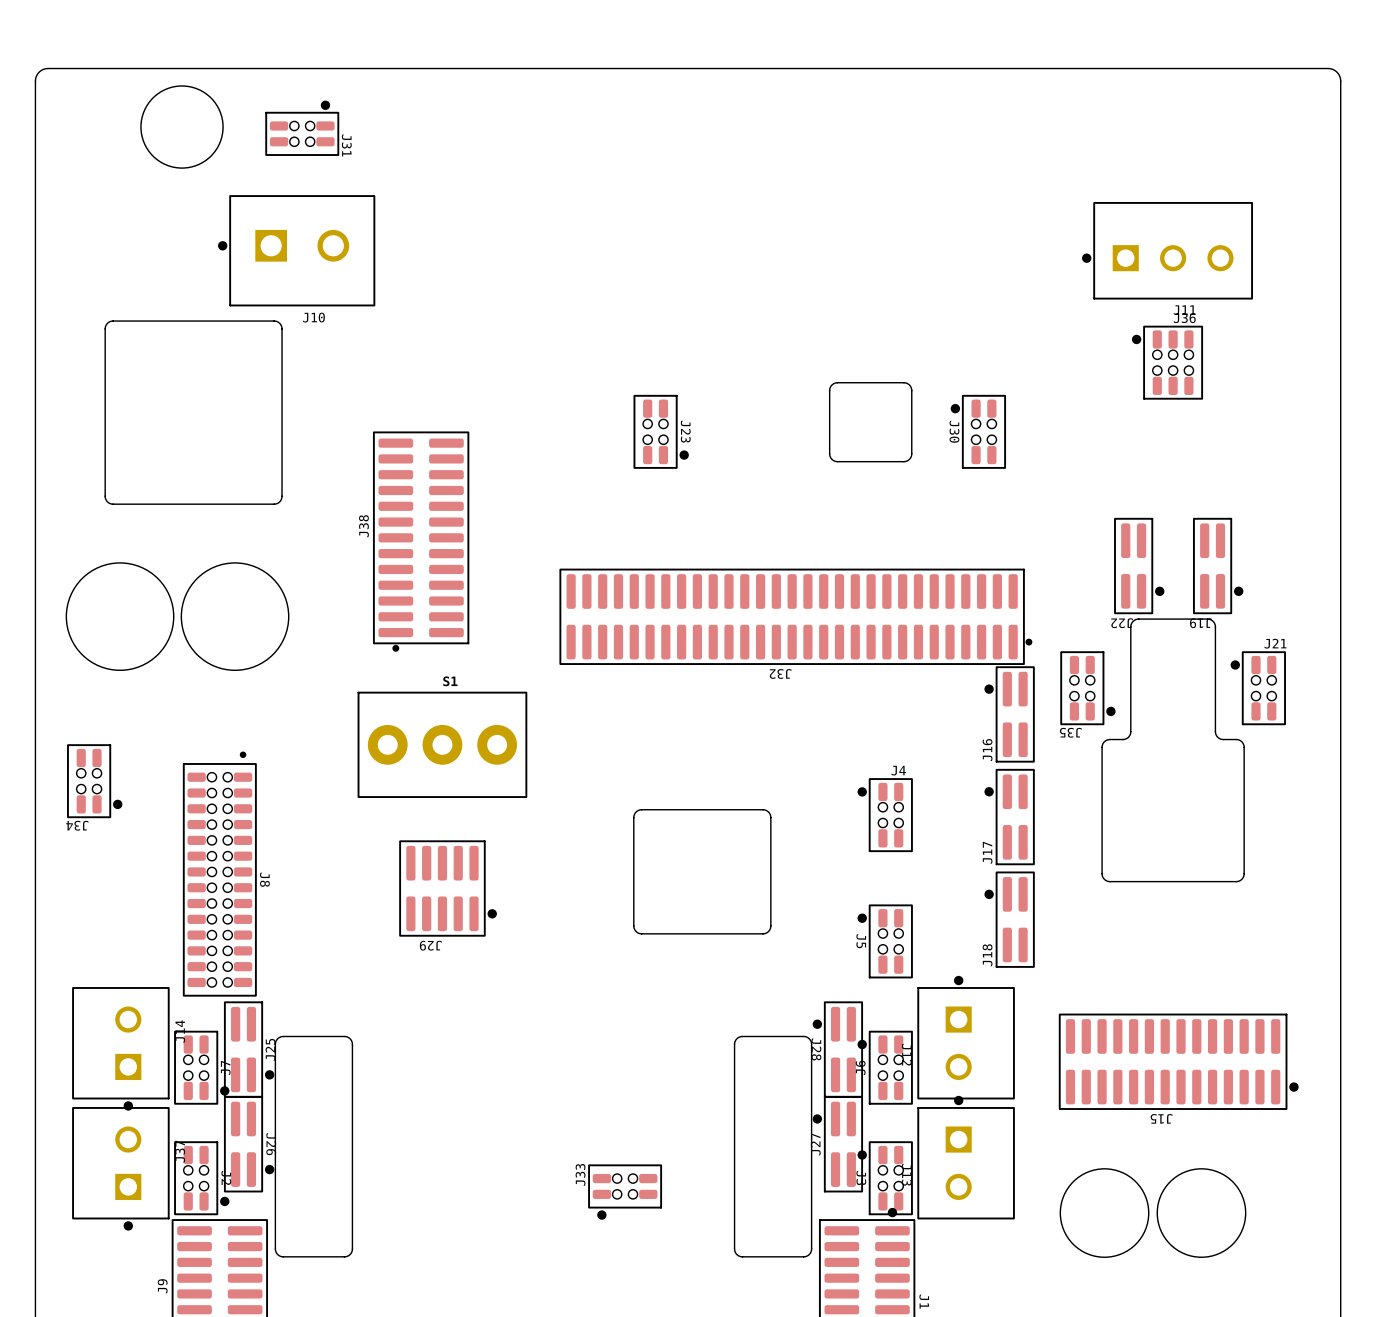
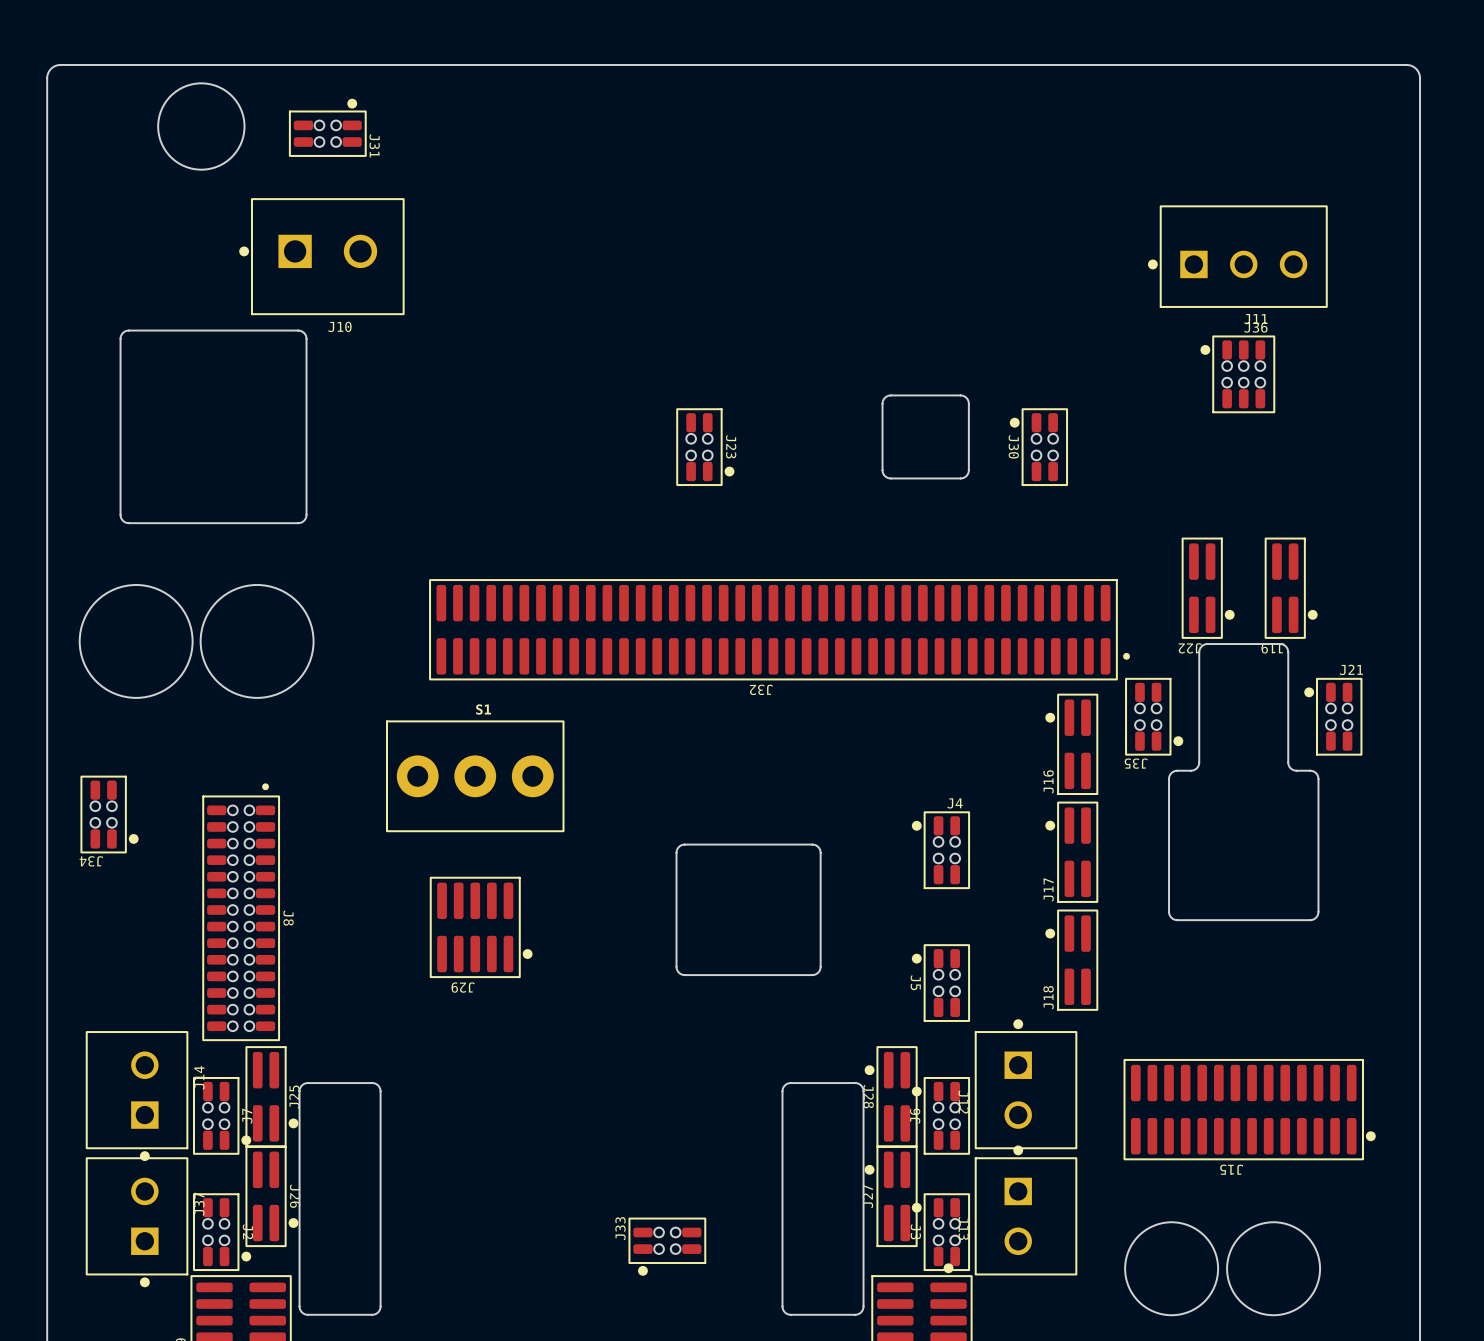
J38: (421, 541) -> none
J32 footprint: [559, 568, 1033, 665] -> [429, 579, 1130, 681]

